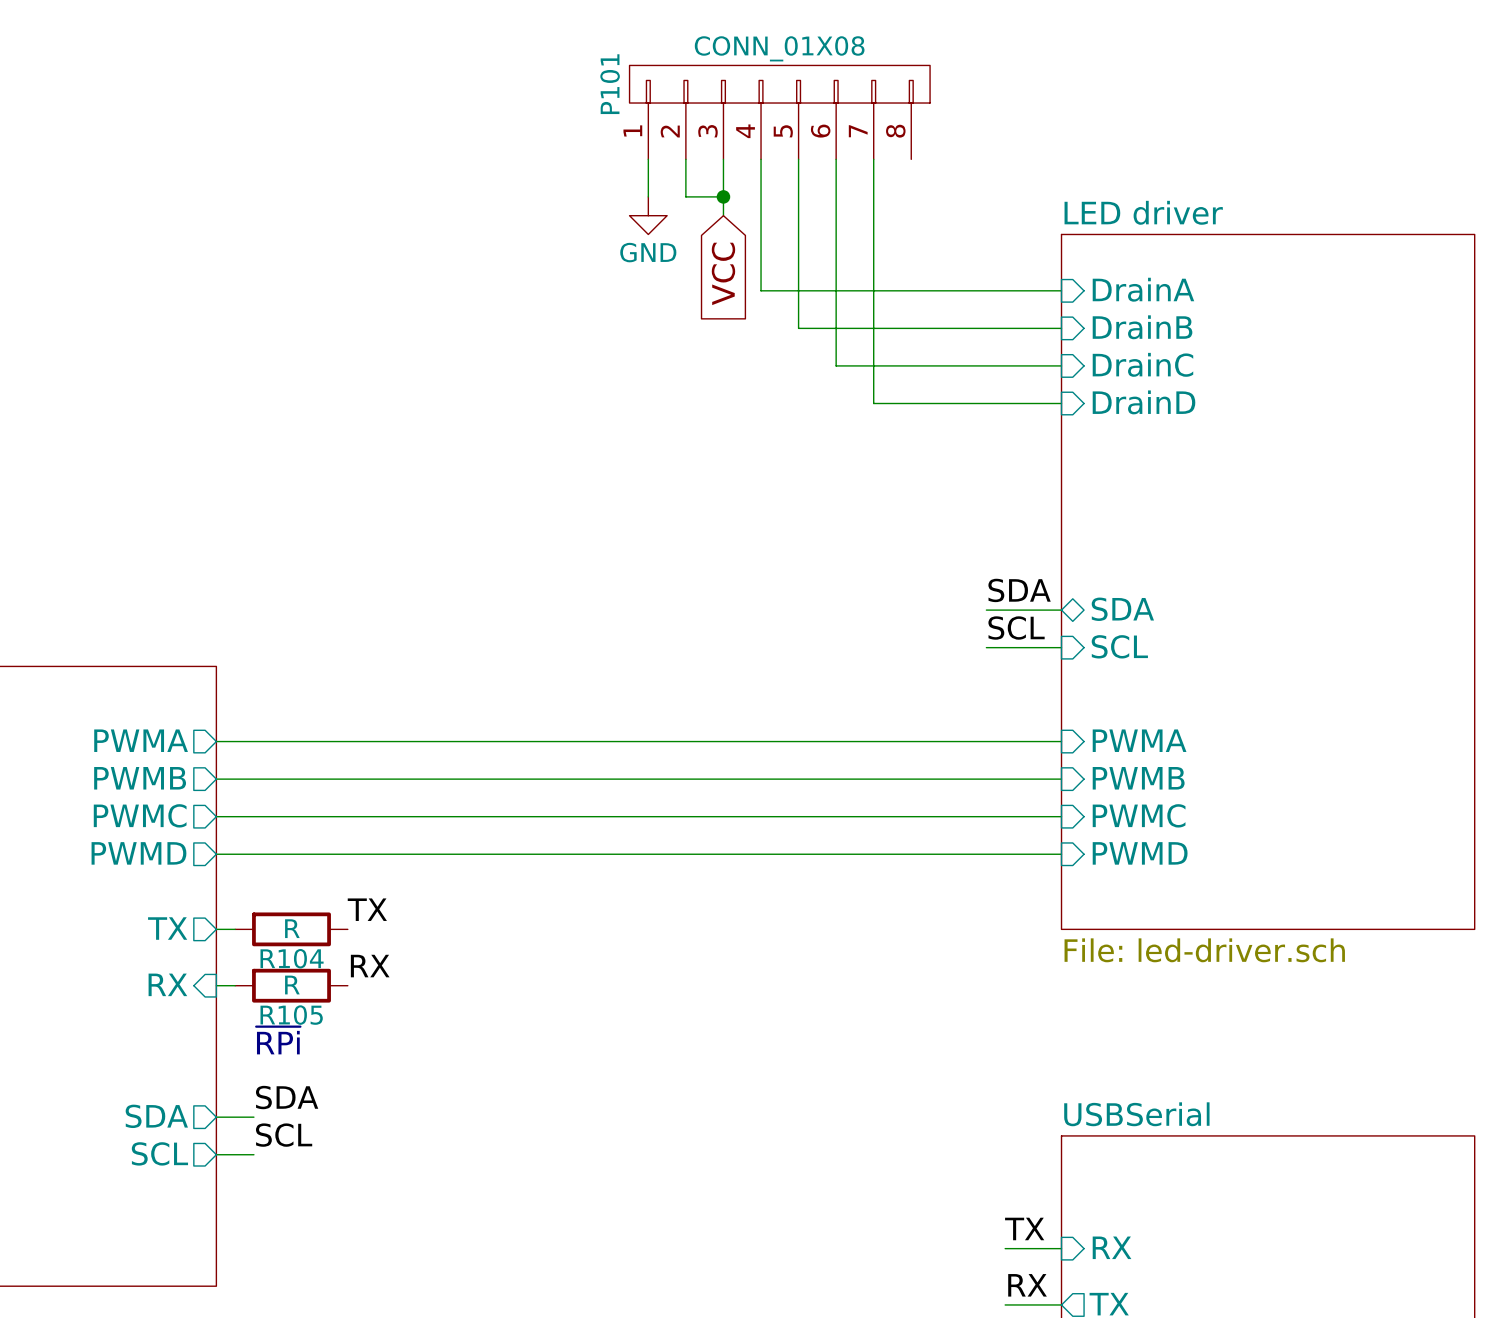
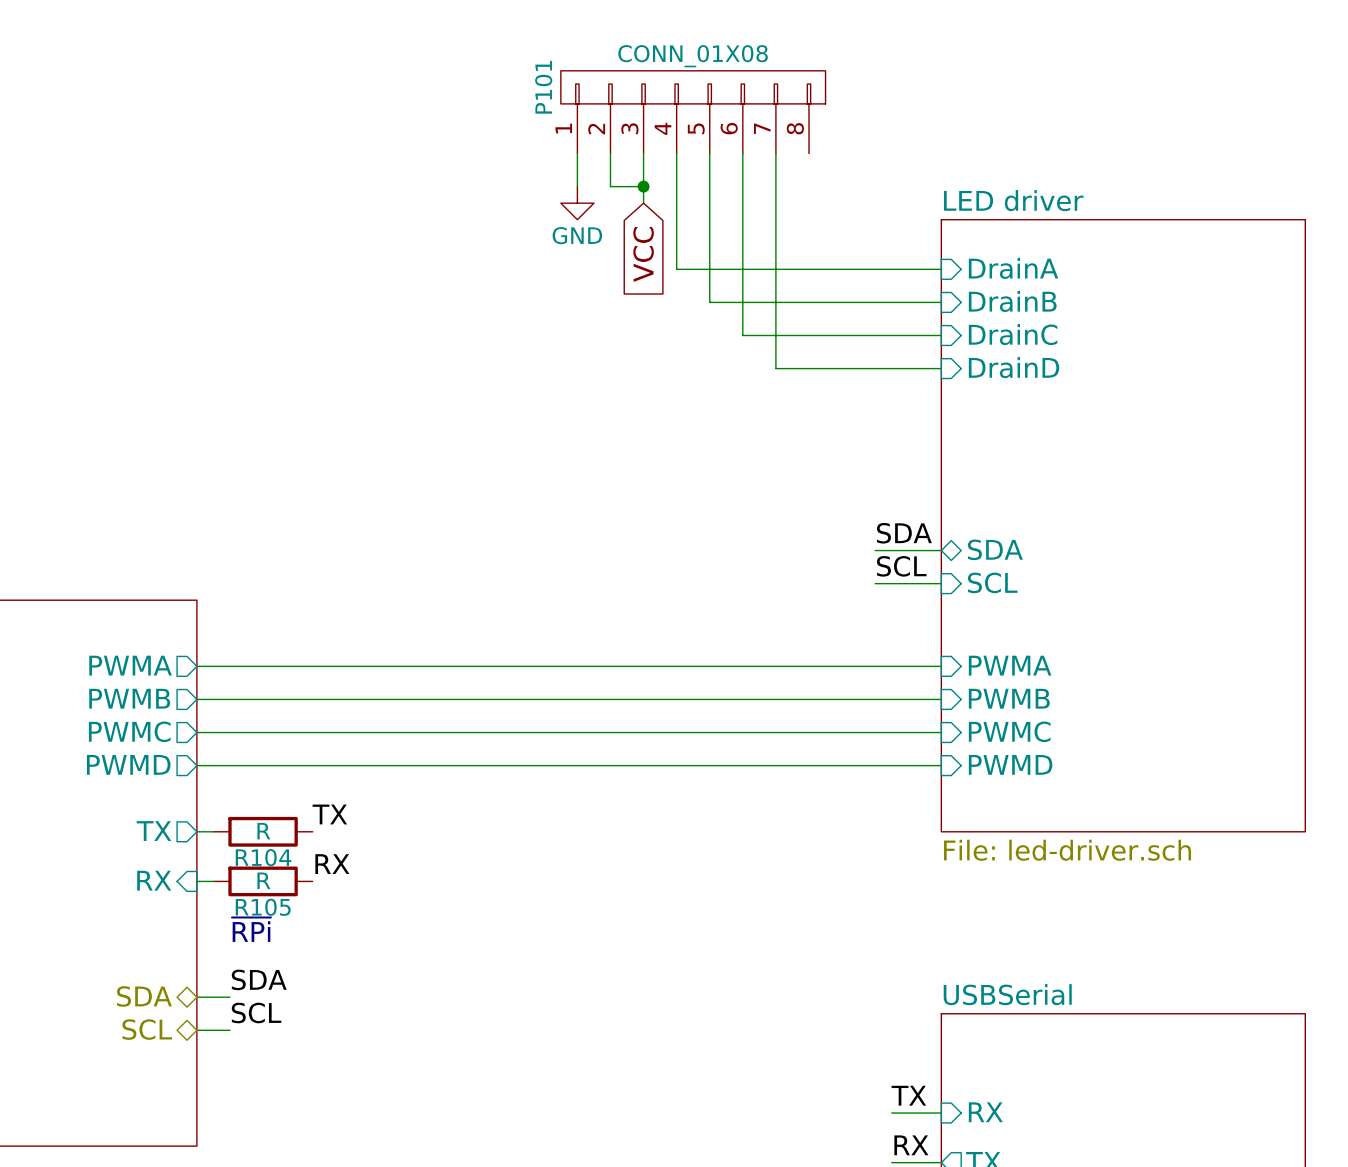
sheet pin: SDA (156, 1116) -> none
hierarchical label: none -> SDA (144, 996)
sheet pin: SCL (159, 1153) -> none
hierarchical label: none -> SCL (147, 1029)

